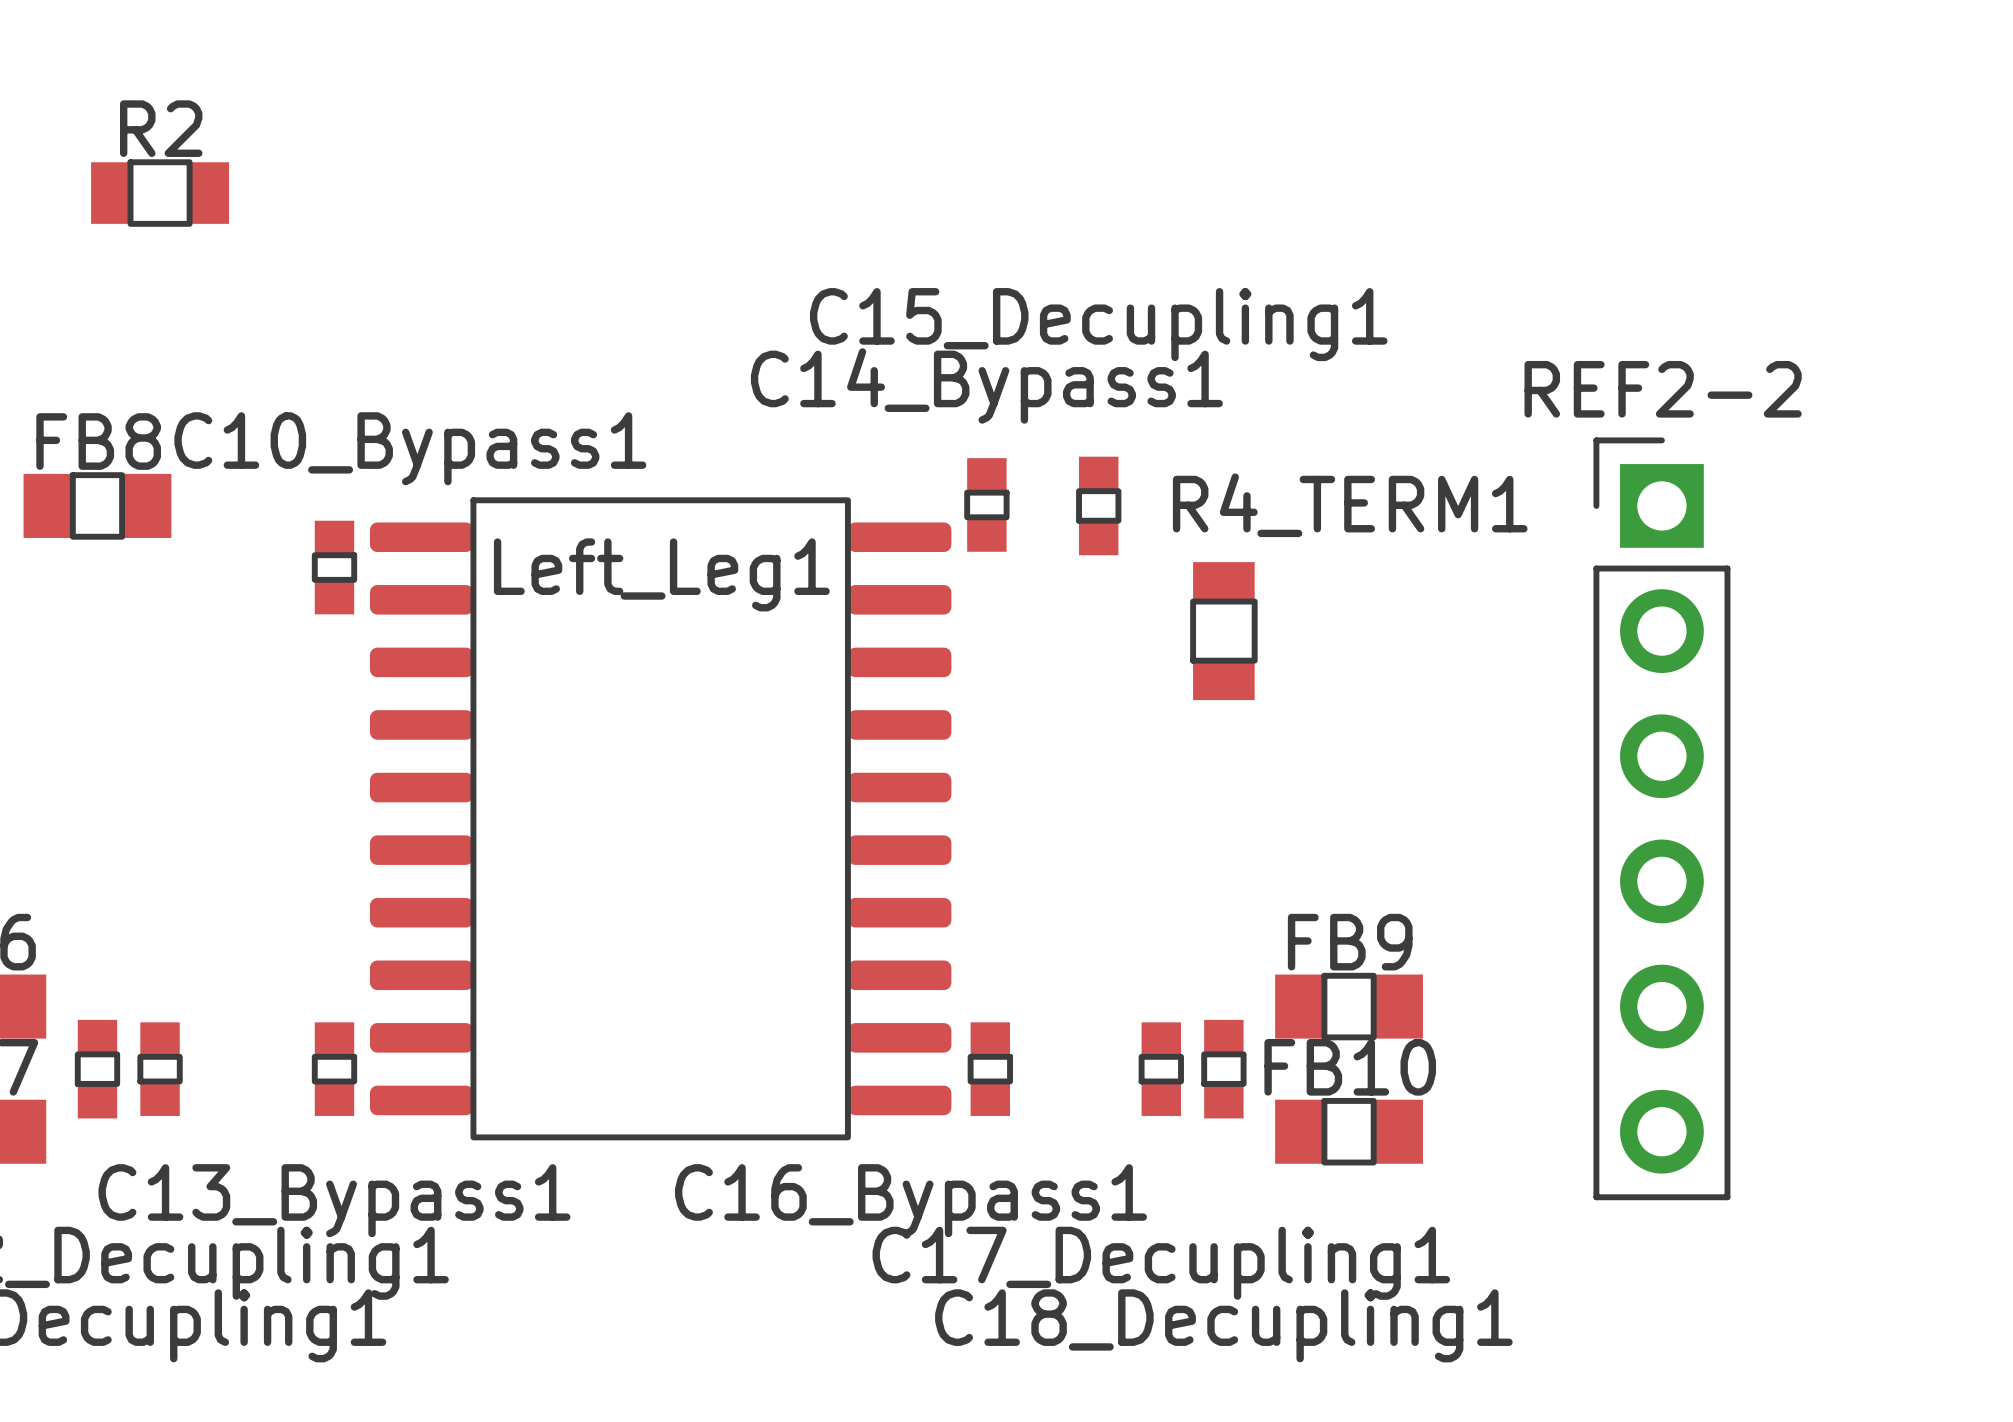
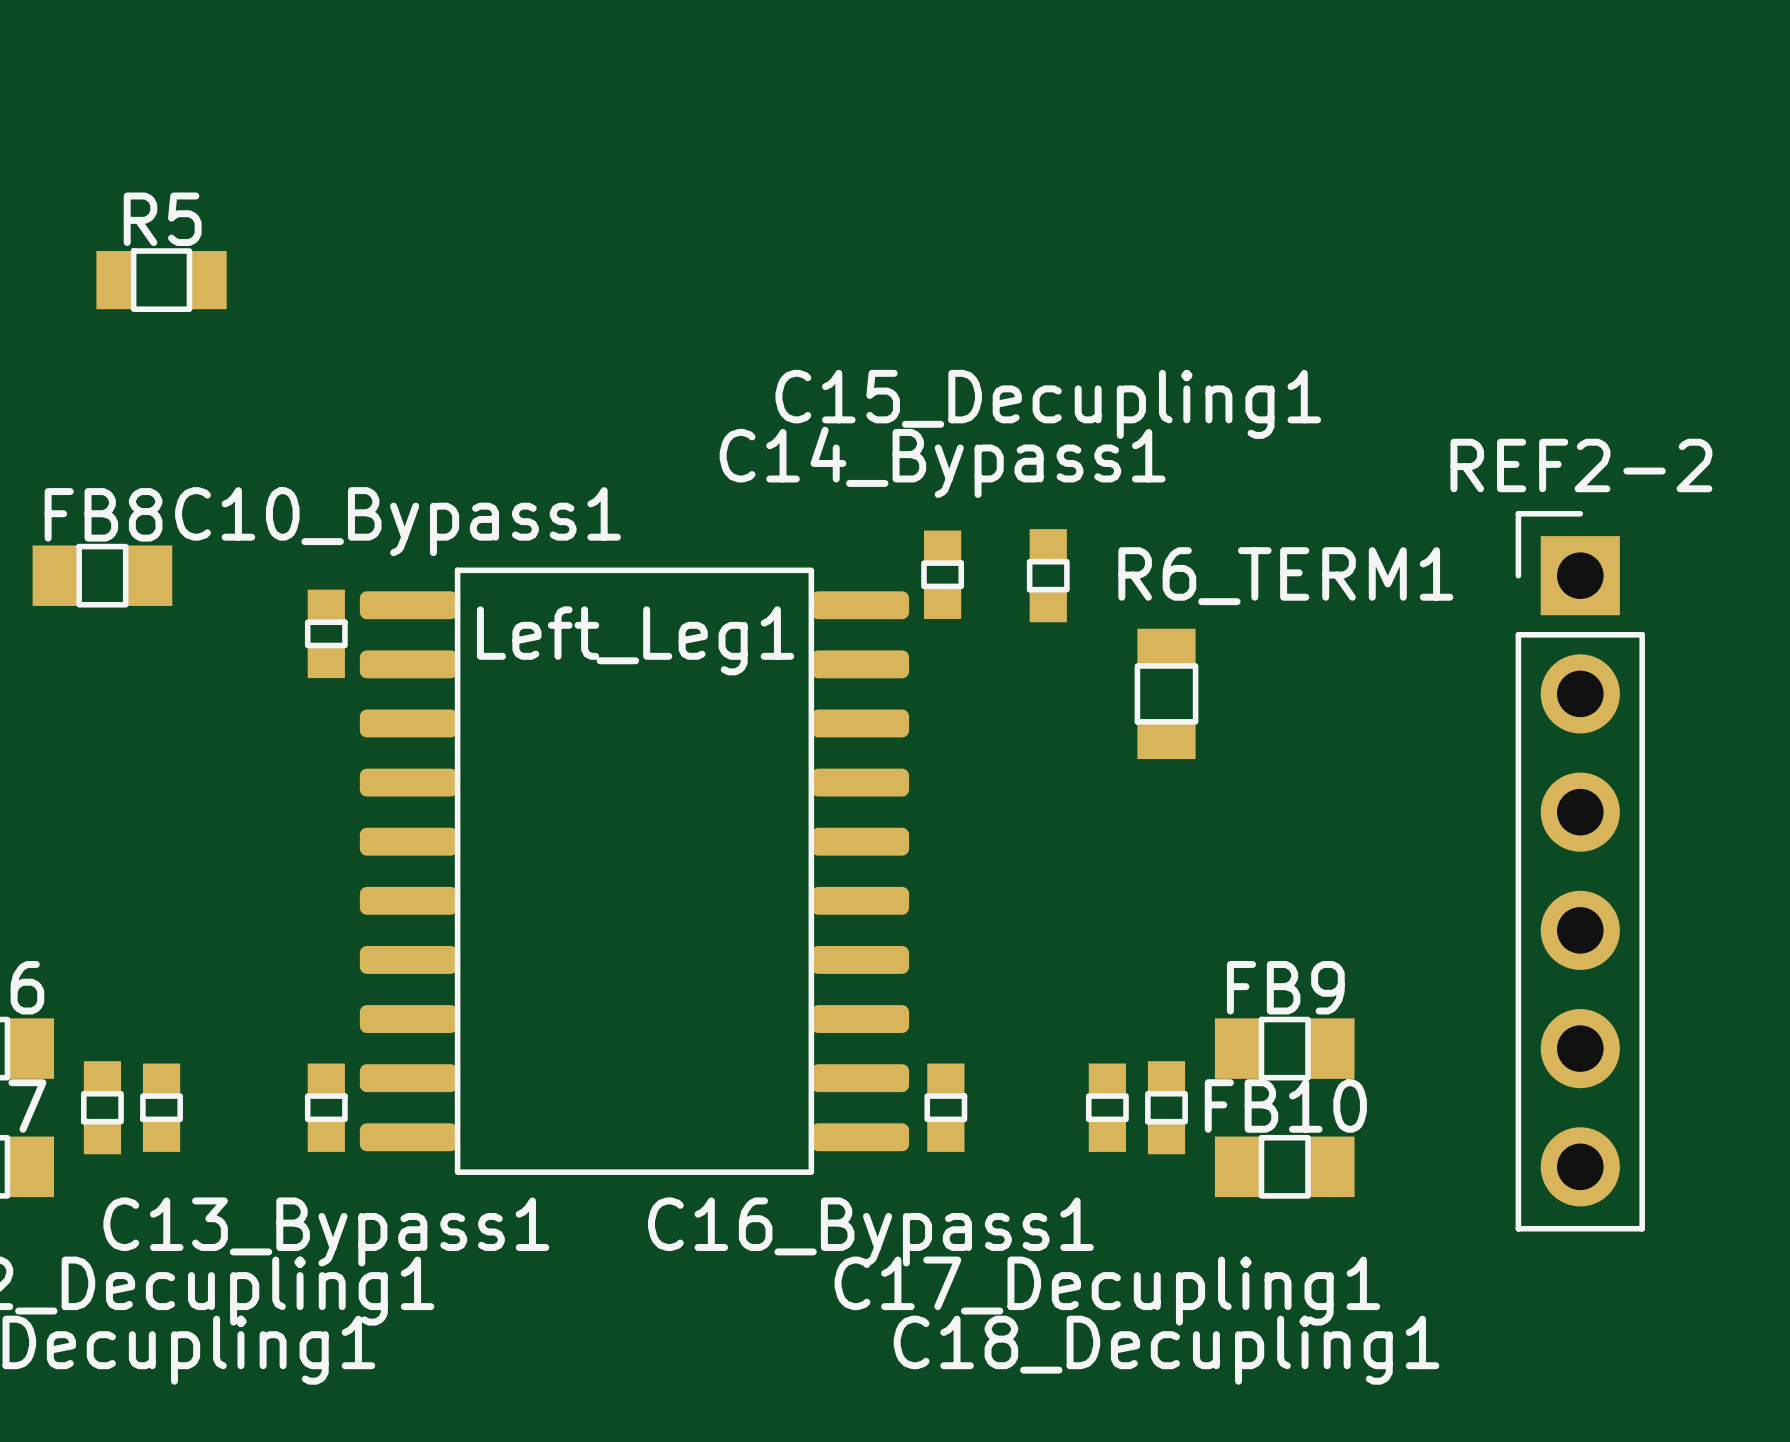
R2 name: R2 (161, 128) -> R5 (162, 219)
R4_TERM1 name: R4_TERM1 (1350, 505) -> R6_TERM1 (1285, 576)

